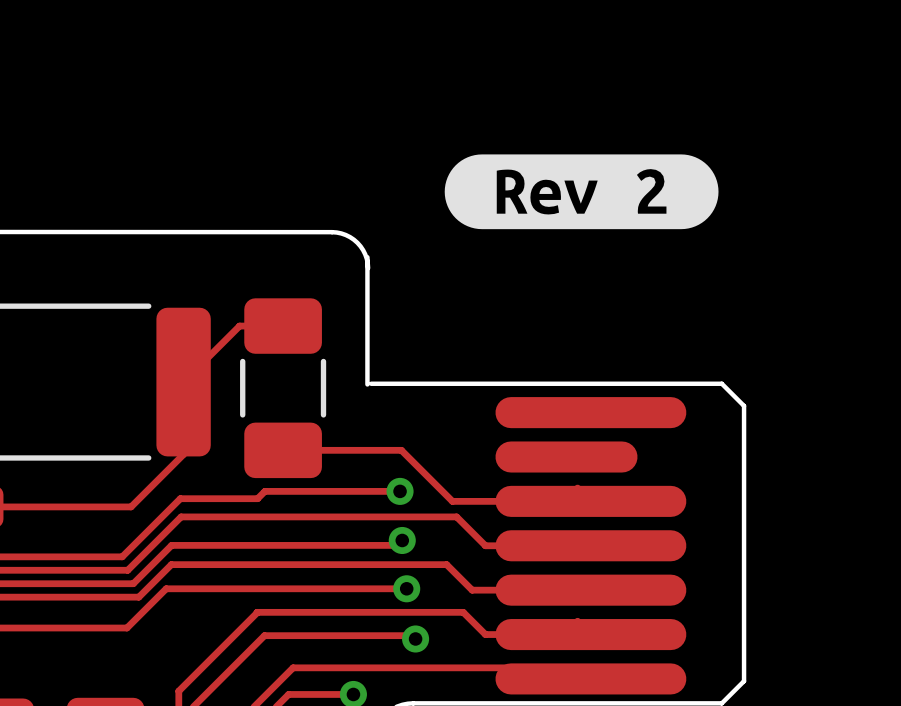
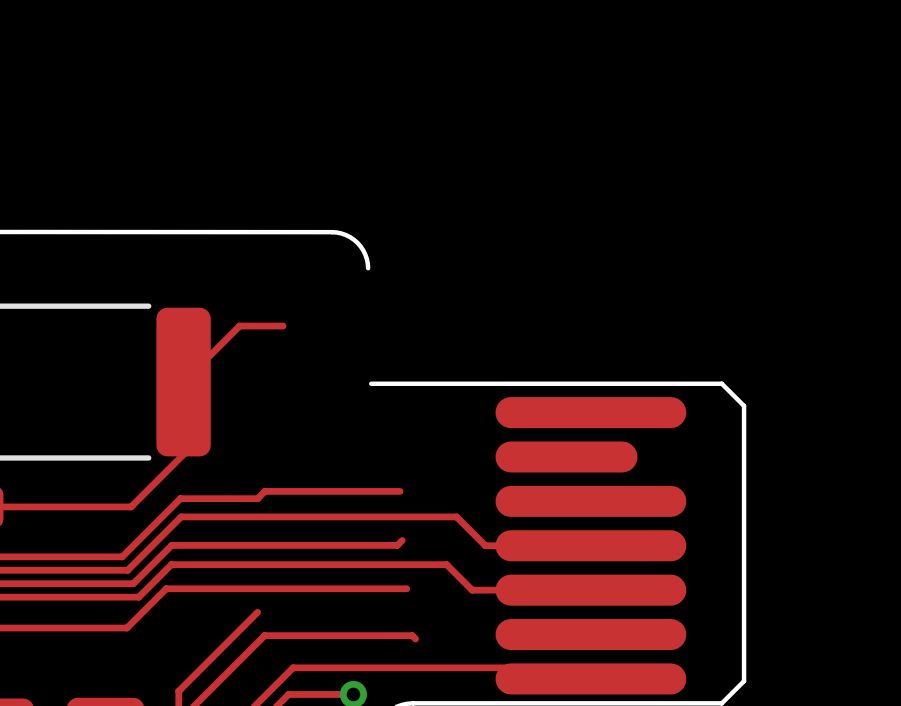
drawing: [444, 154, 719, 230] -> none
board edge: (367, 257) (367, 384) -> none
part: (283, 388) -> none
track: (294, 461) (283, 450) (401, 450) (452, 501) (590, 501) (577, 488) -> none
via: (400, 491) -> none
via: (402, 540) -> none
via: (406, 588) -> none
track: (256, 612) (463, 612) (485, 634) (590, 634) (577, 621) -> none
via: (415, 638) -> none

